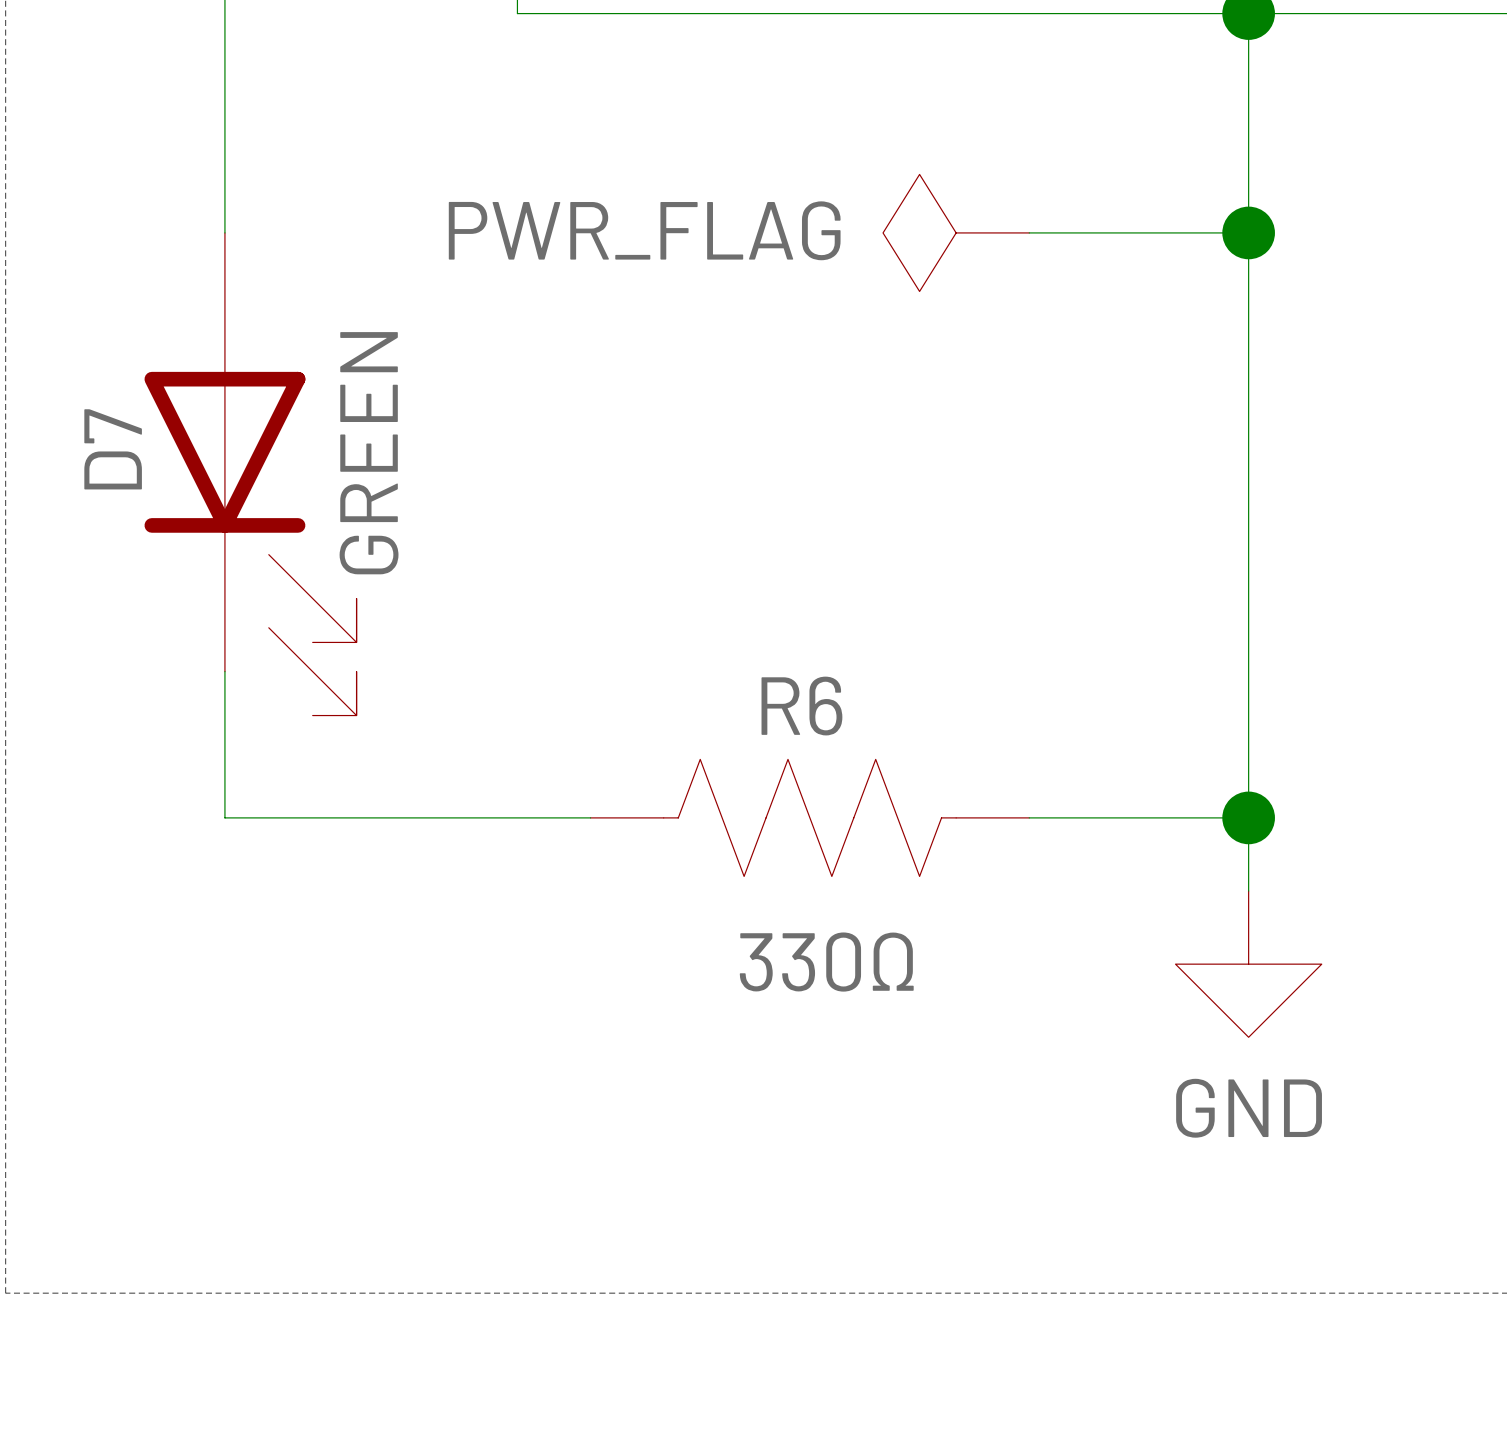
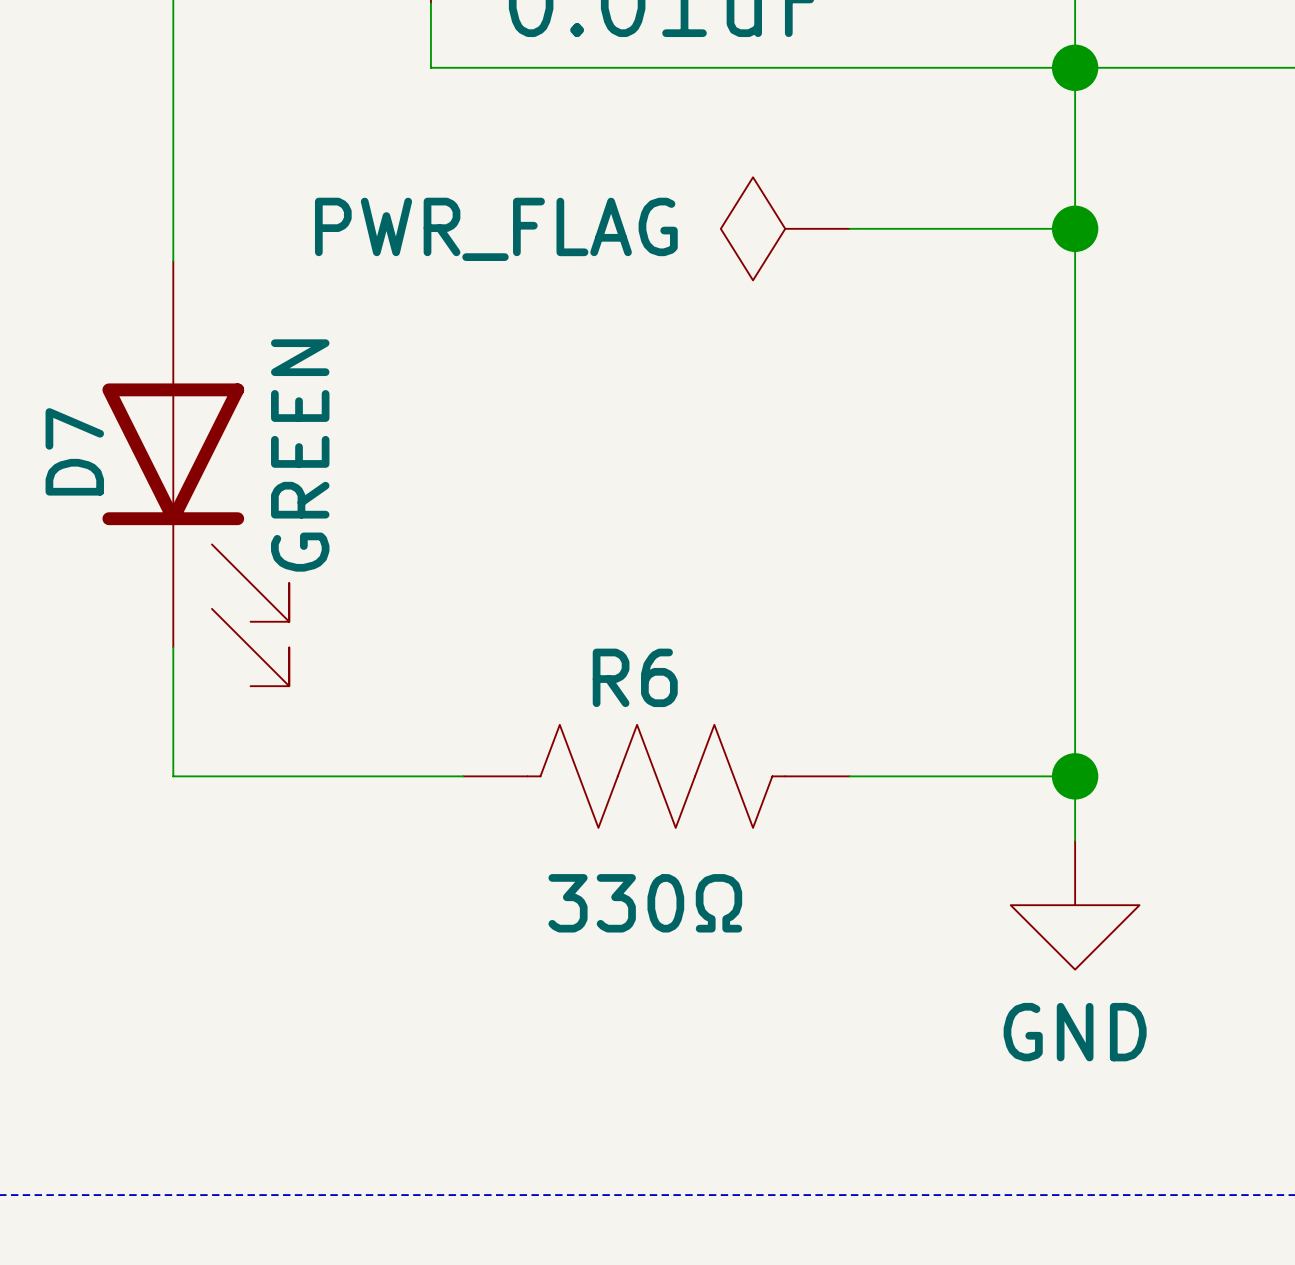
wire: none -> (849, 228) (1075, 228)
power symbol position: PWR_FLAG (956, 232) -> PWR_FLAG (785, 228)
wire: (1029, 232) (1248, 232) -> none
junction position: (1248, 232) -> (1075, 228)
R6 position: (809, 817) -> (656, 776)

